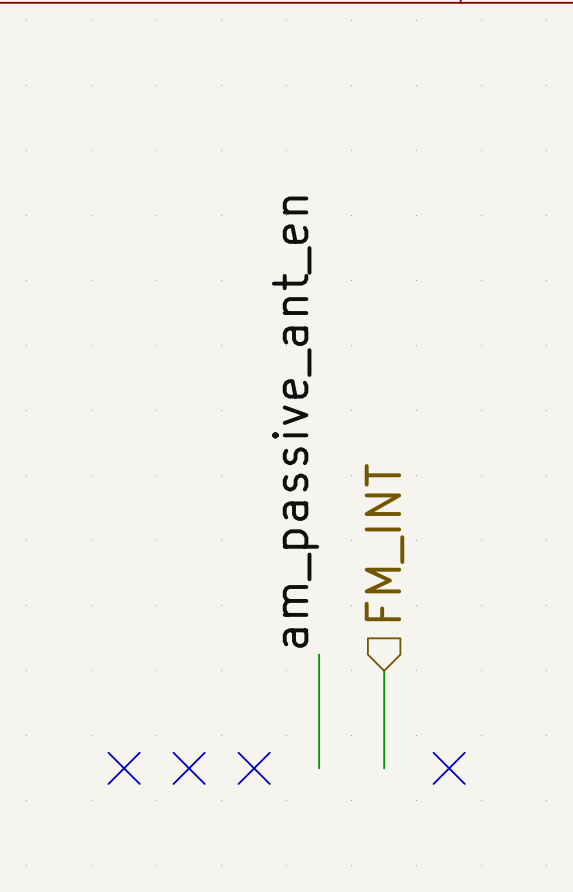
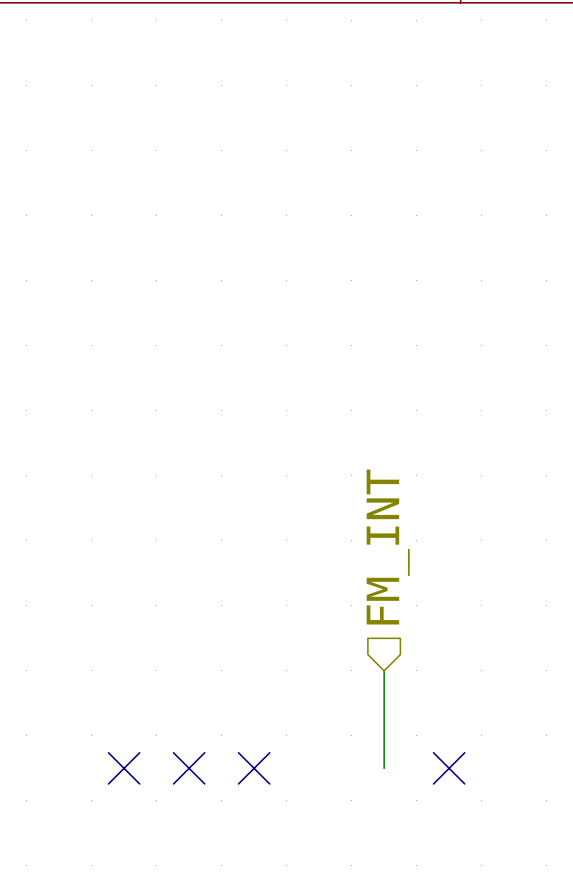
label: am_passive_ant_en (295, 422) -> none
wire: (319, 654) (319, 768) -> none

